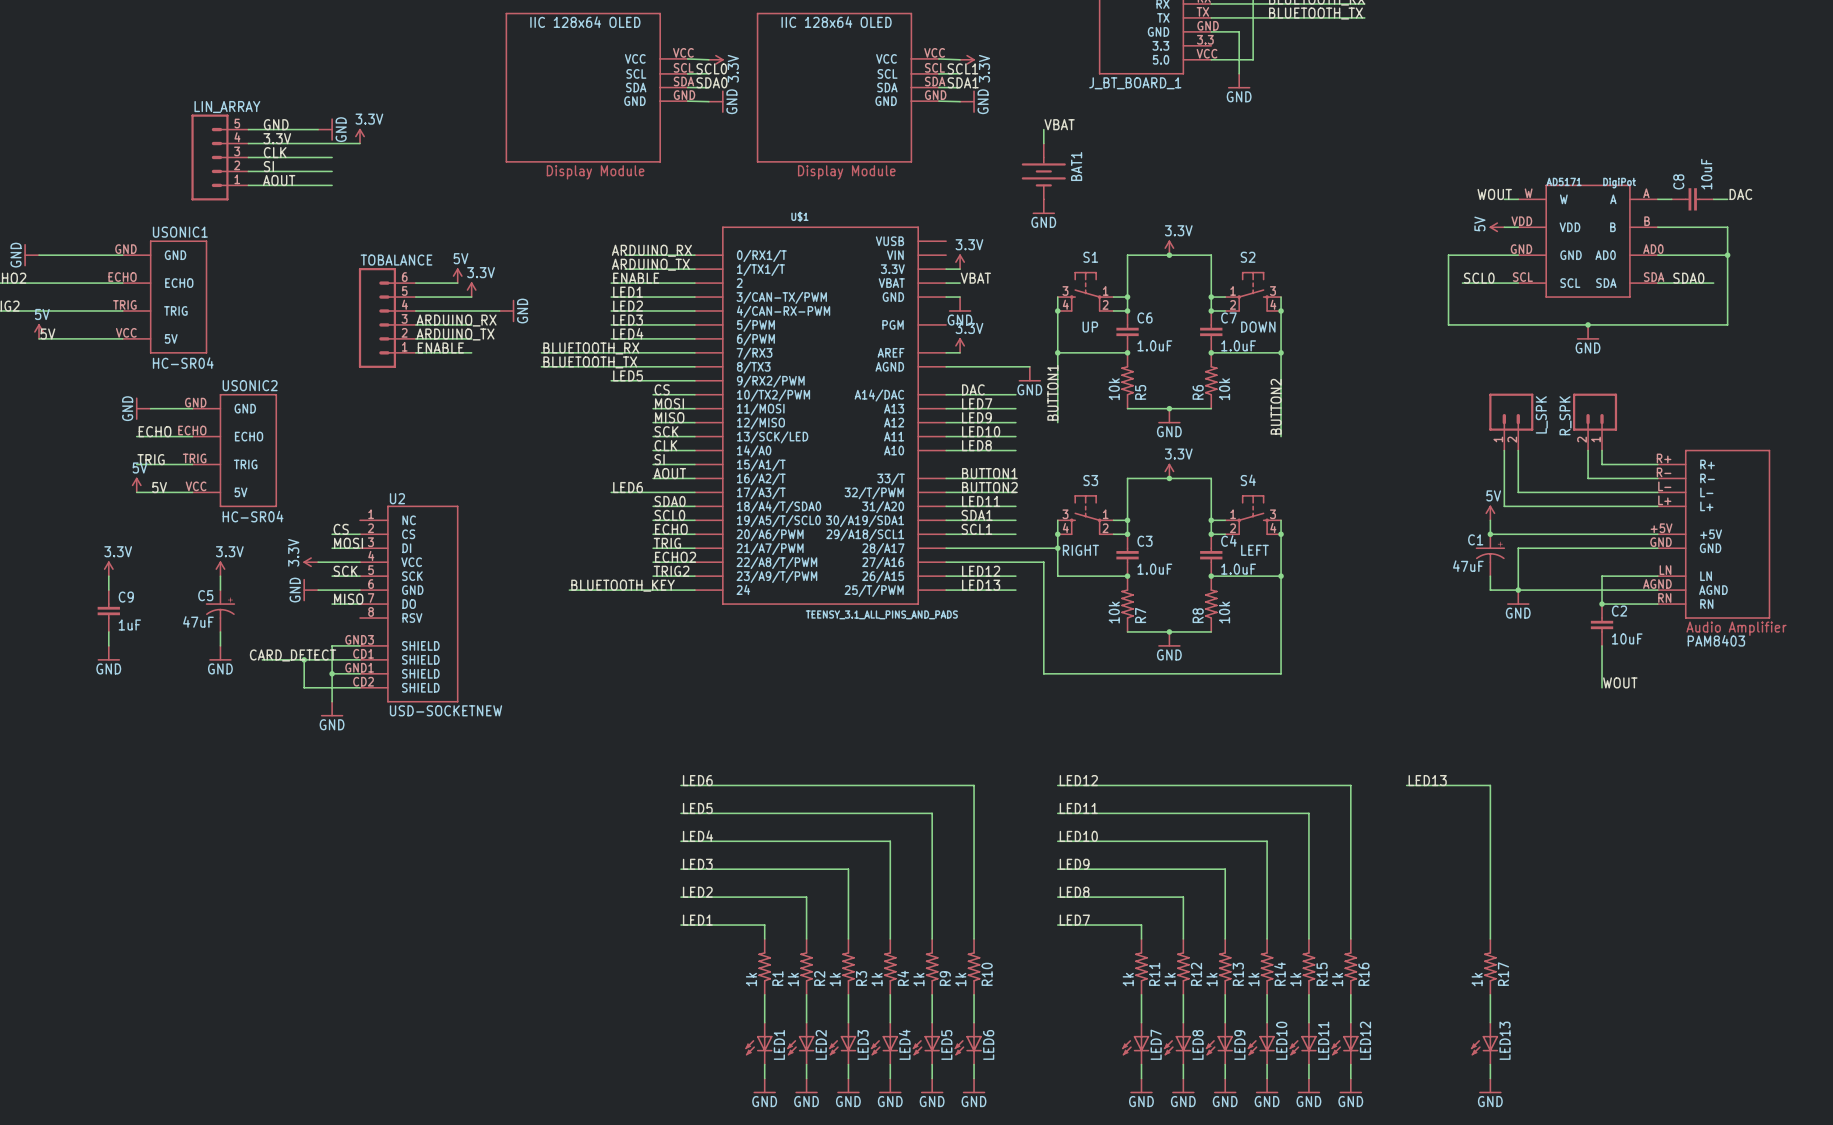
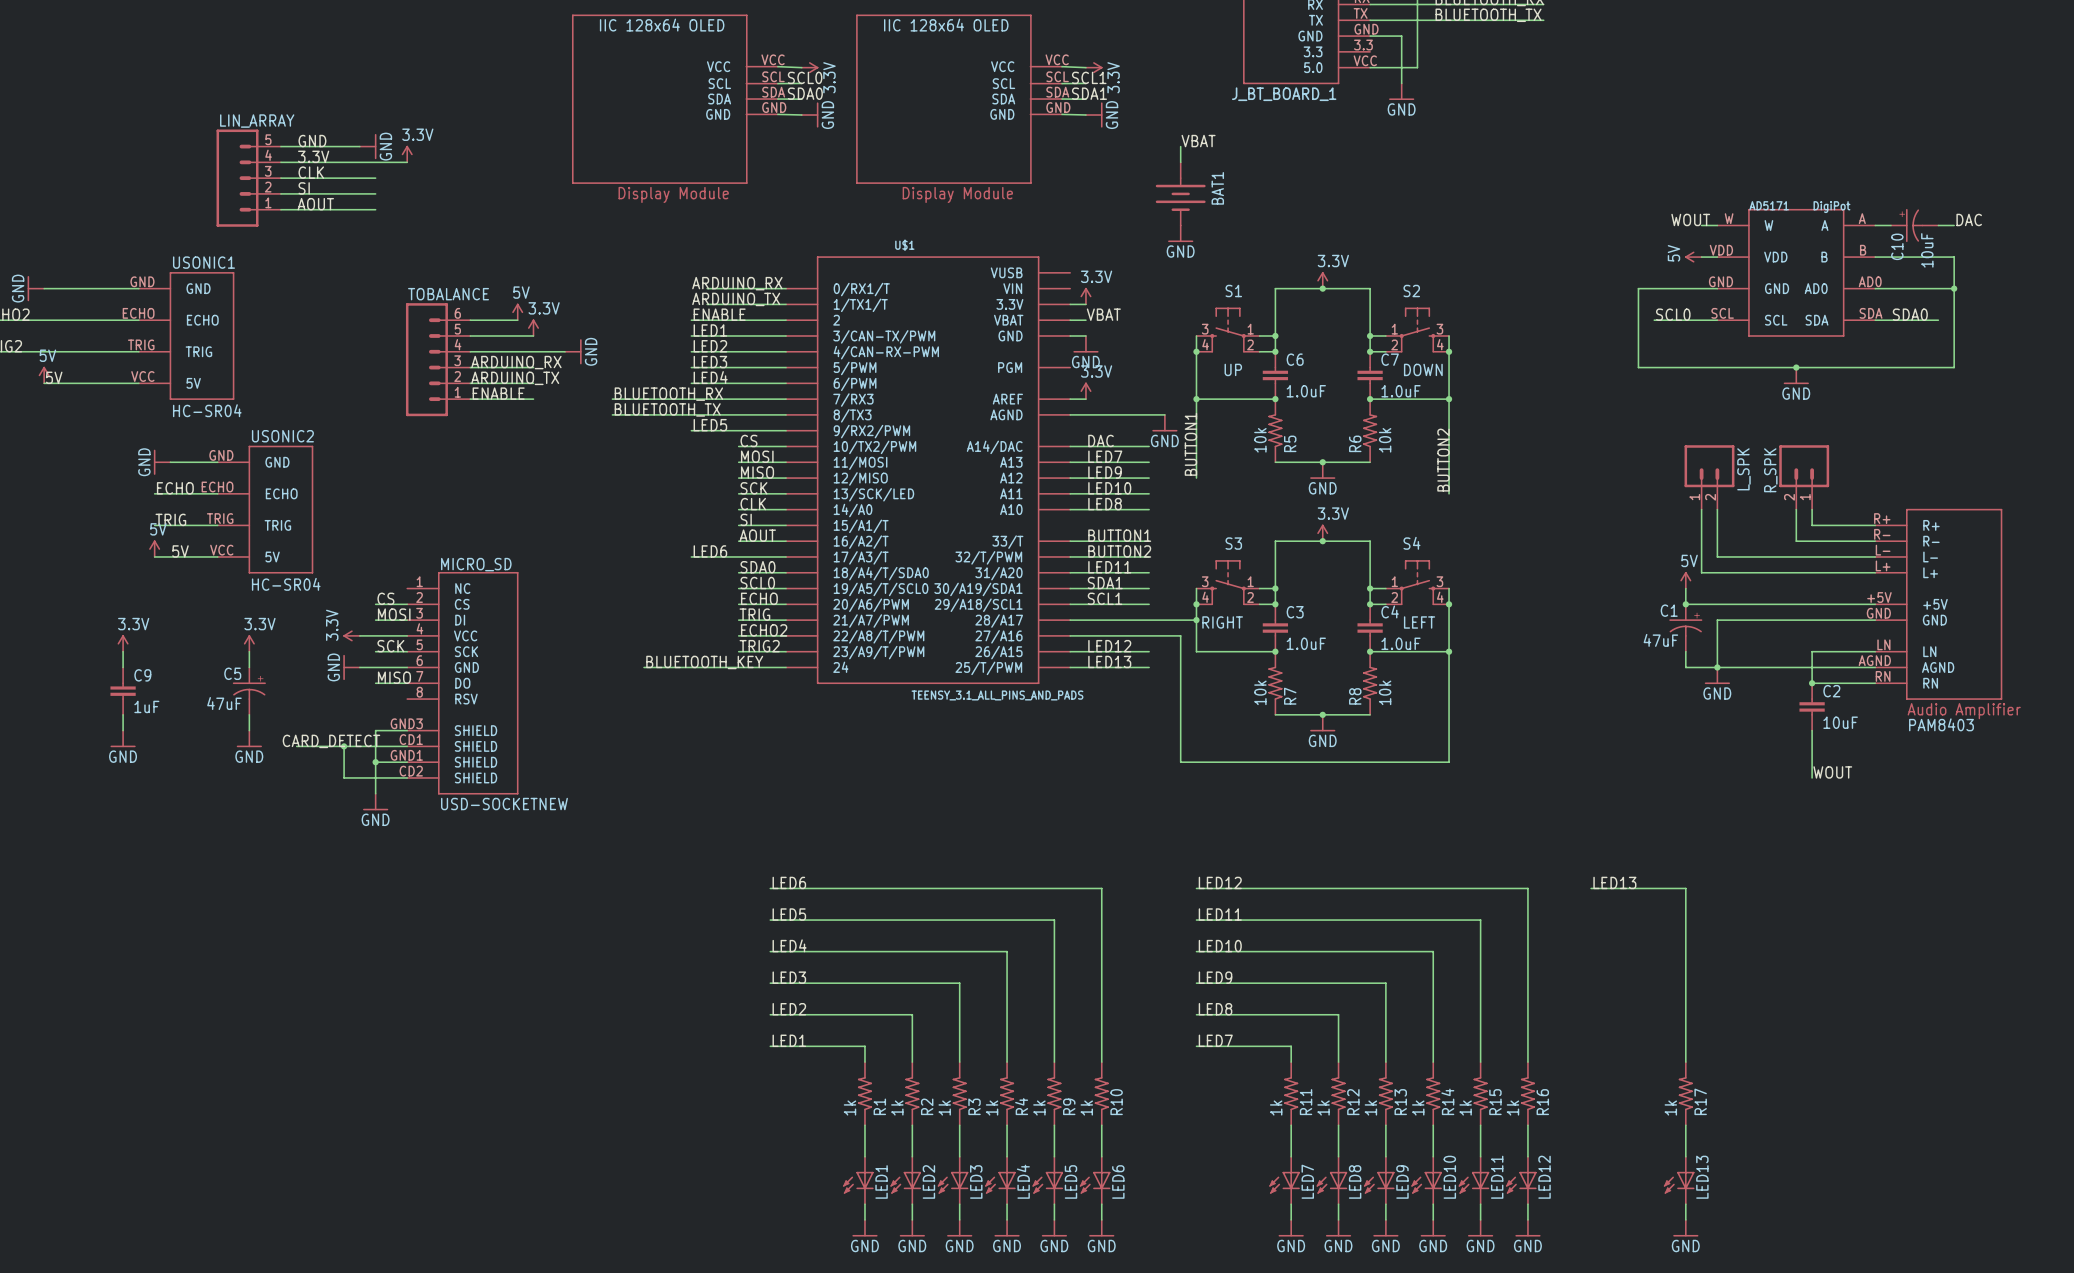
C8: 10uF (1692, 199) -> none
C10: none -> 10uF (1914, 225)
U2 name: U2 (397, 498) -> MICRO_SD (476, 564)

